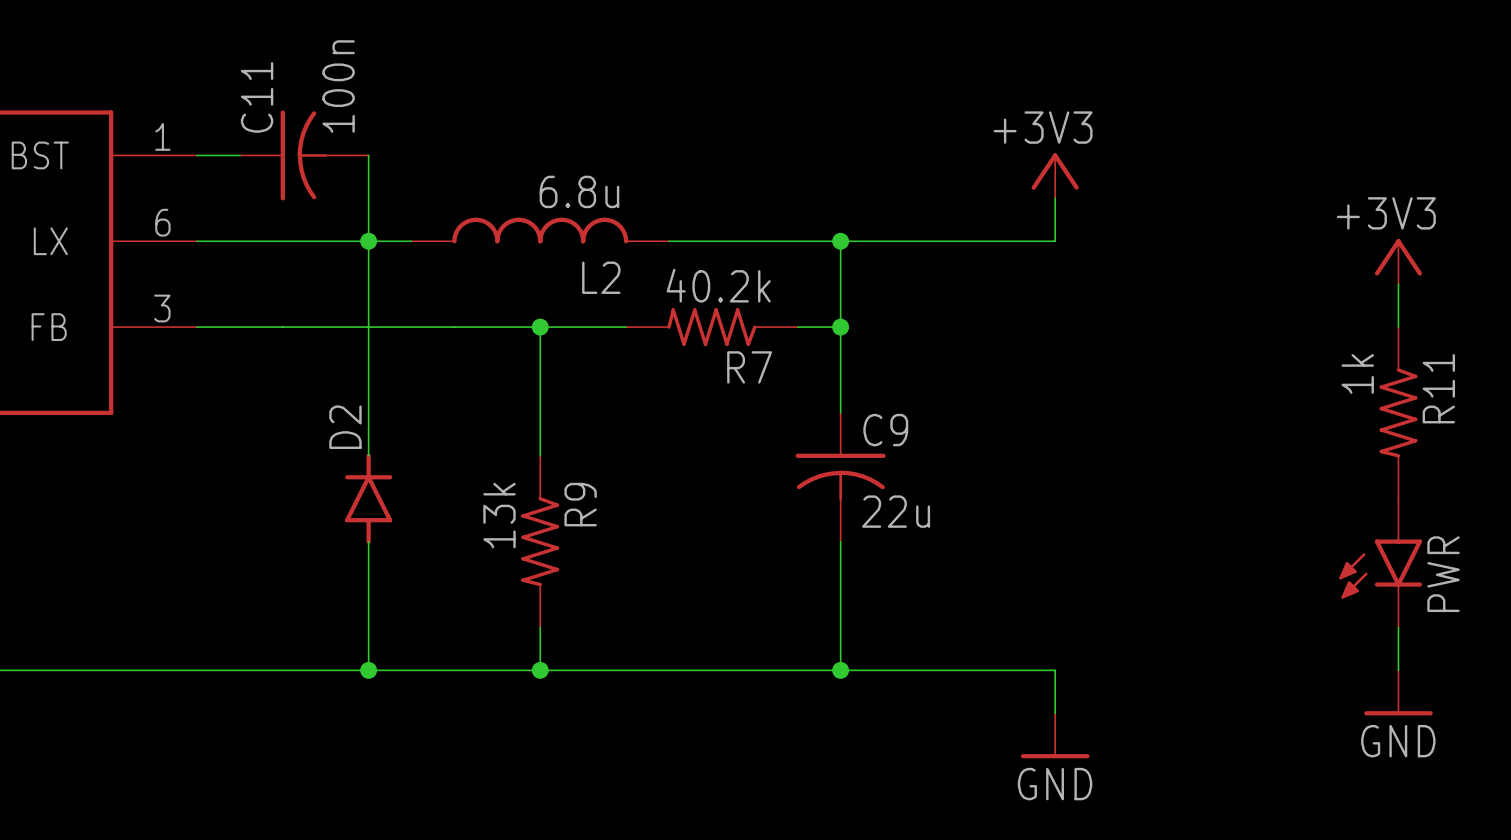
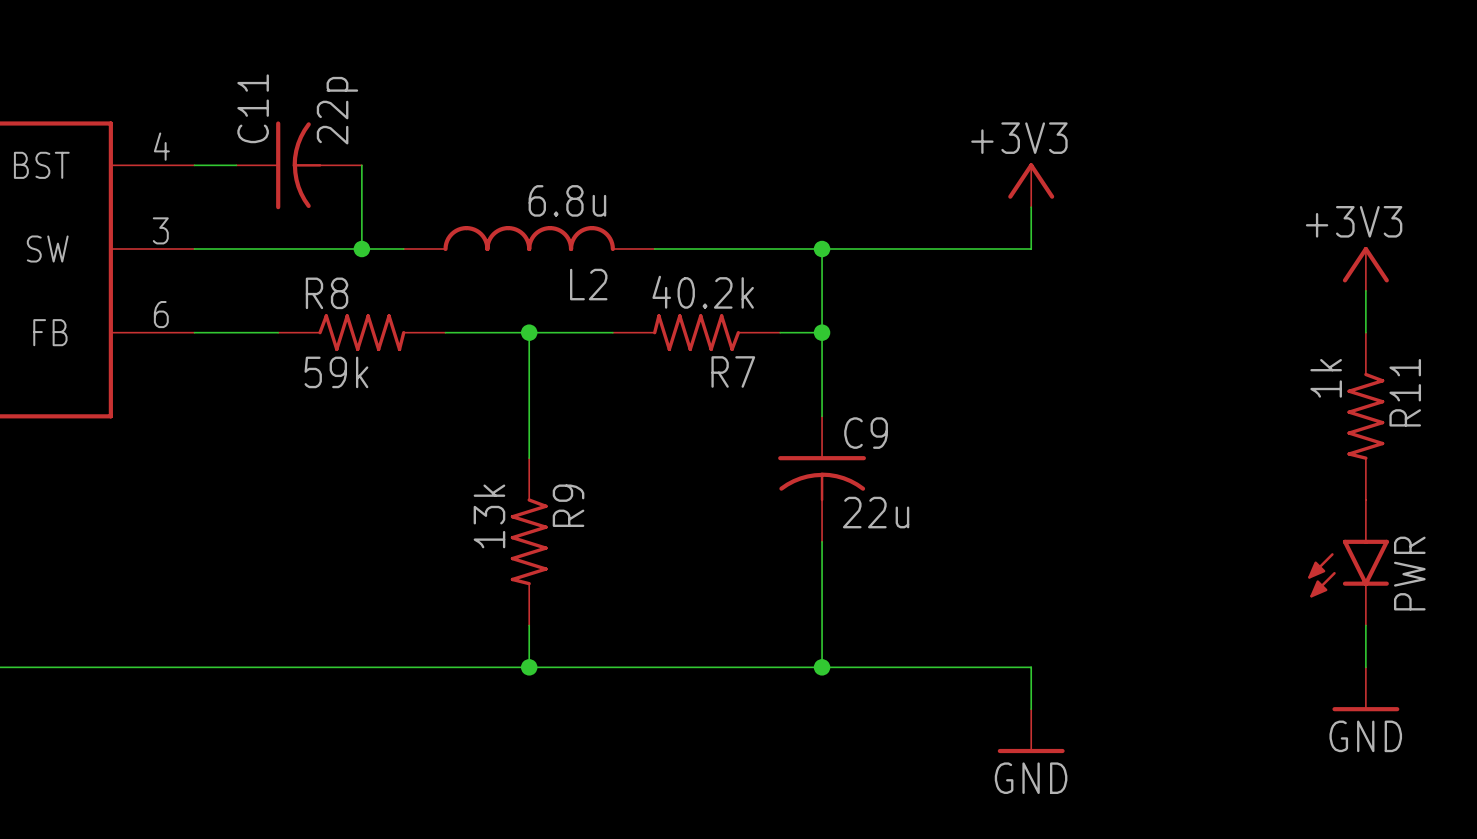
C11 value: 100n (338, 86) -> 22p (337, 110)
part pin number: 1 (162, 136) -> 4 (161, 146)
part pin number: 6 (162, 222) -> 3 (160, 230)
part pin name: LX (50, 241) -> SW (47, 249)
wire: (368, 241) (368, 455) -> none
part pin number: 3 (162, 308) -> 6 (161, 314)
R8: none -> 59k (361, 332)
D2: (368, 498) -> none
wire: (368, 541) (368, 670) -> none
junction: (368, 670) -> none

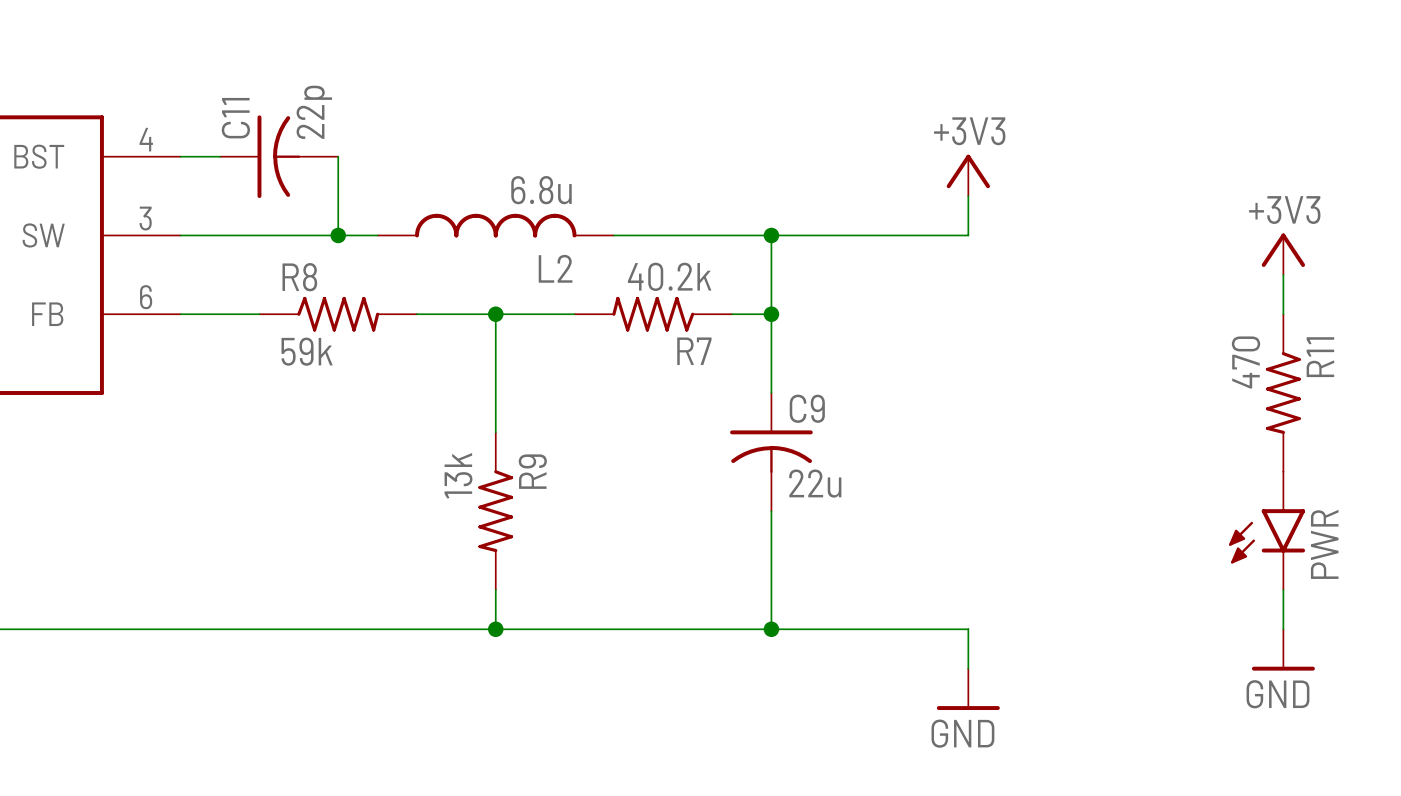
R11 value: 1k (1326, 378) -> 470 (1246, 362)

